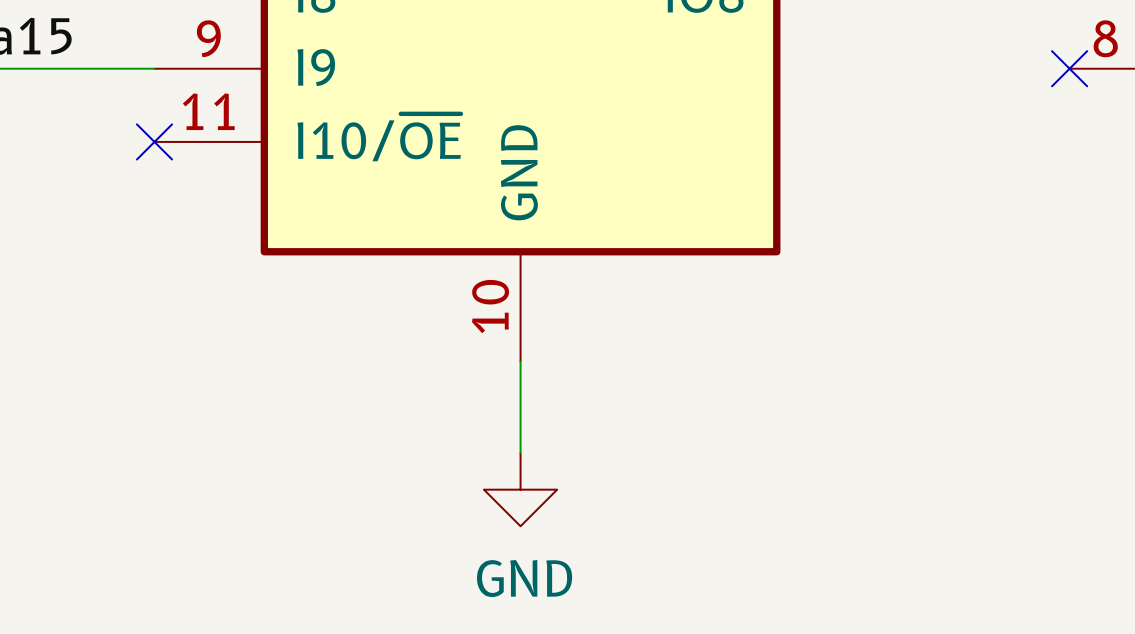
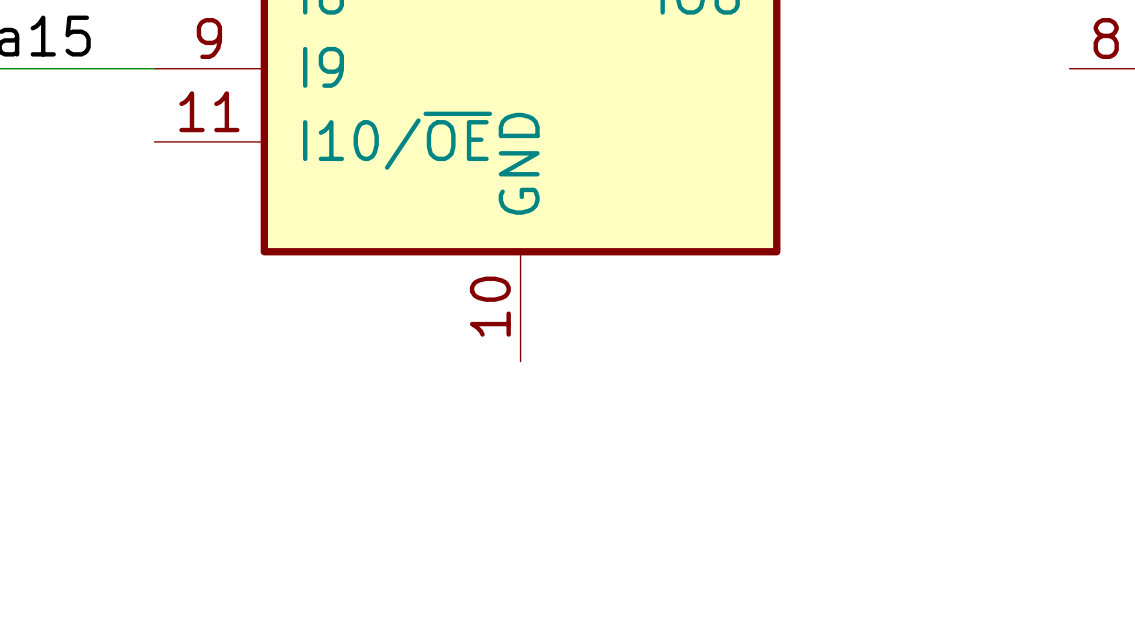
no-connect mark: (1069, 68) -> none
no-connect mark: (154, 141) -> none
wire: (520, 361) (520, 453) -> none
power symbol: GND (520, 489) -> none

